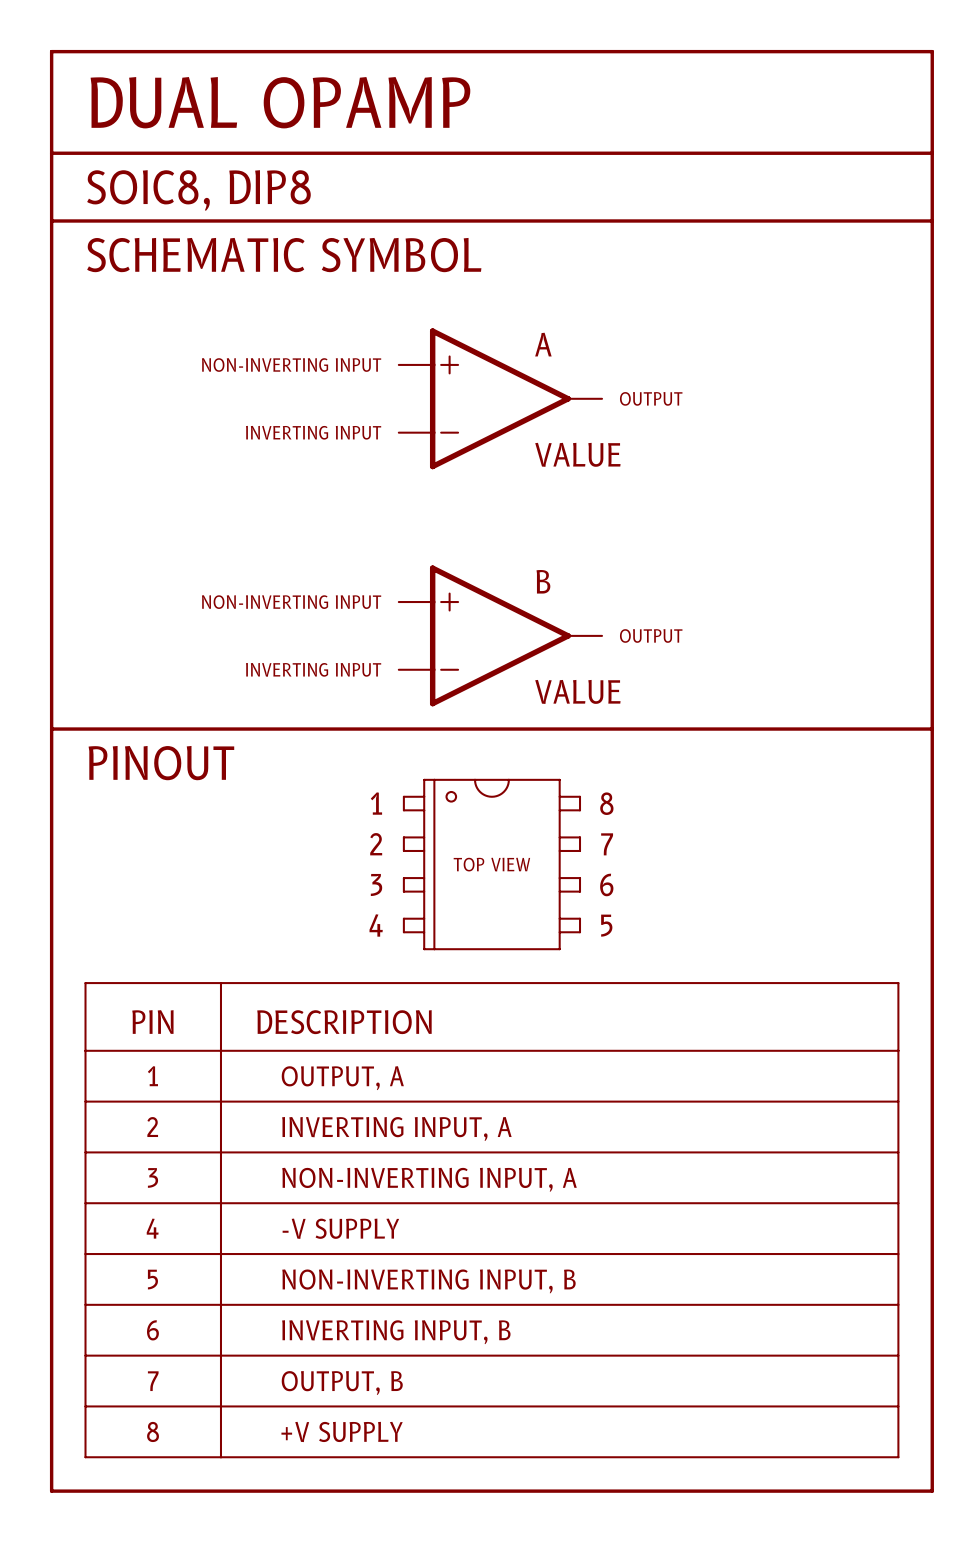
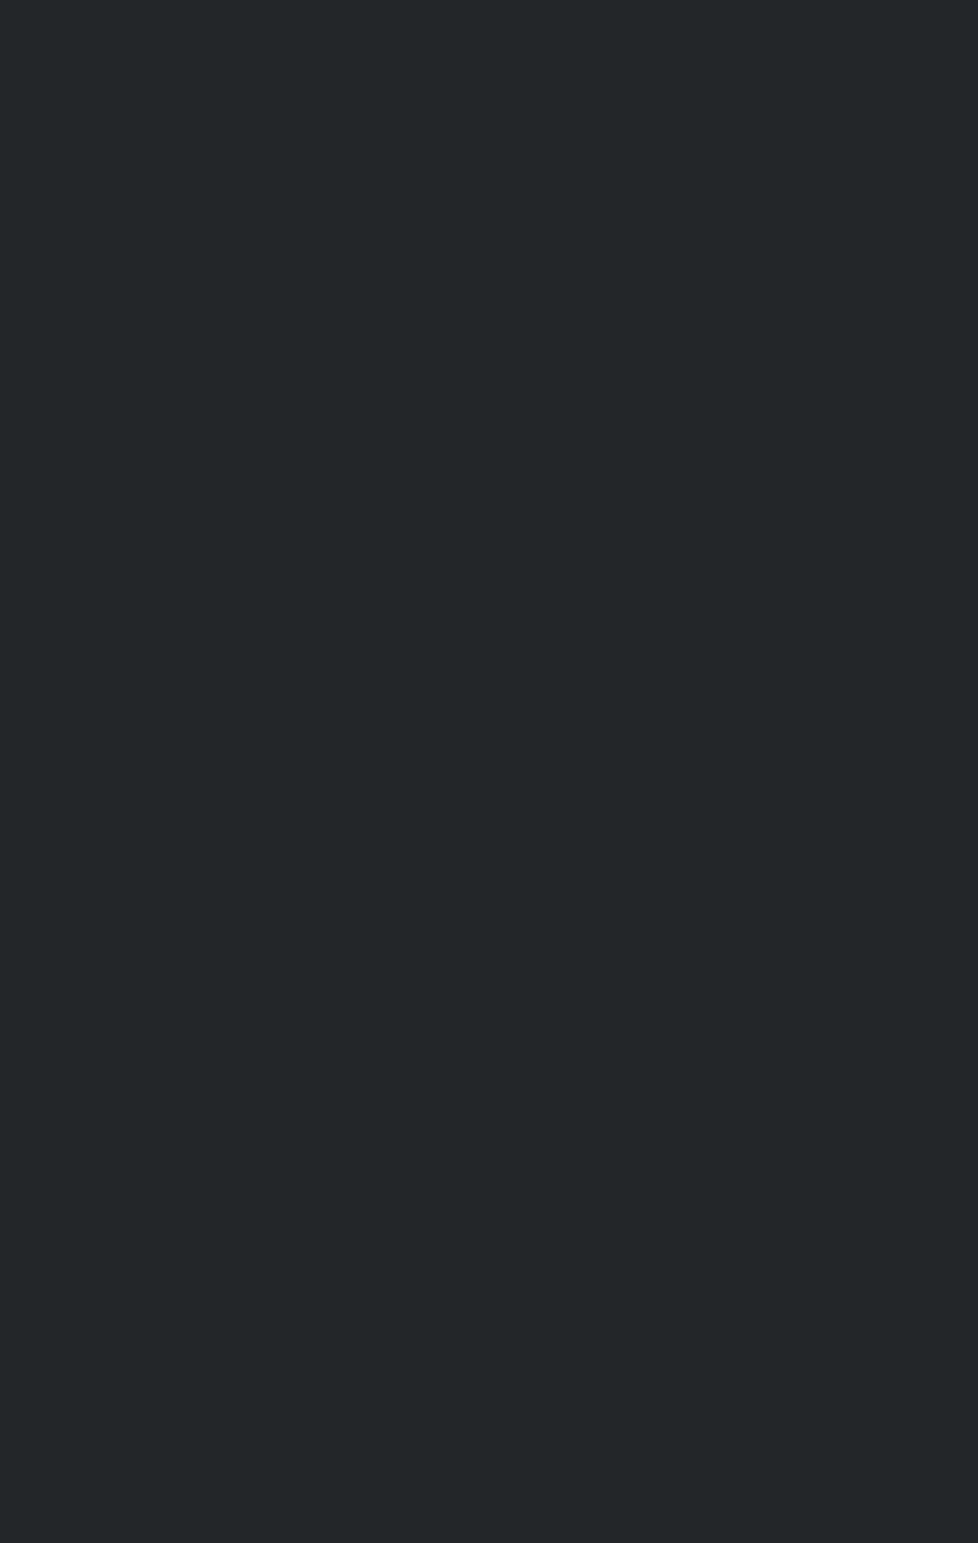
part: (491, 771) -> none

